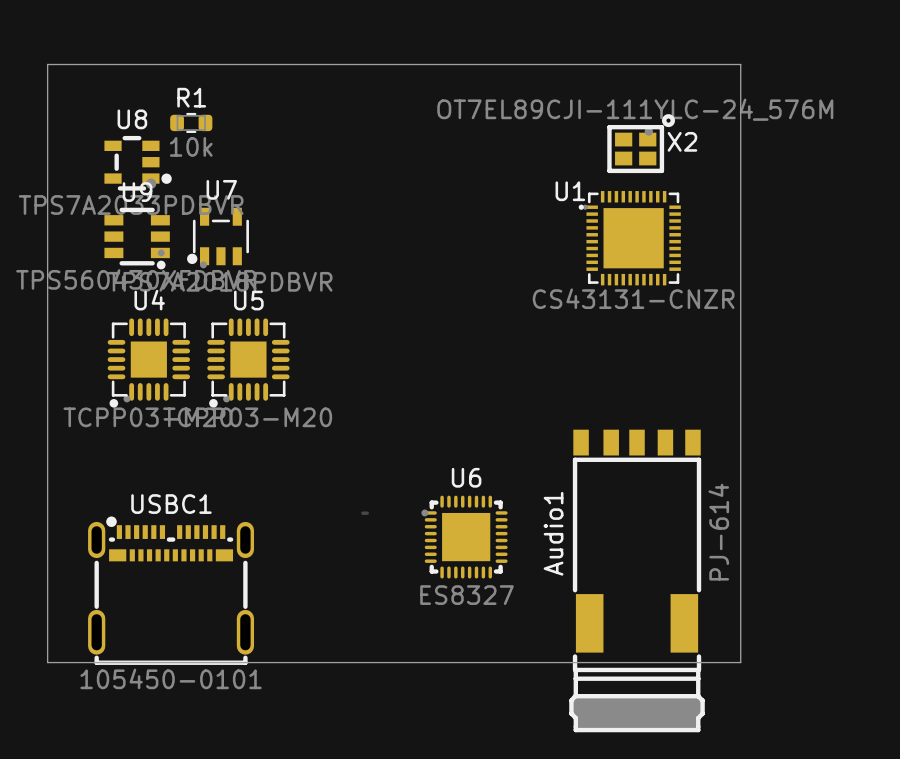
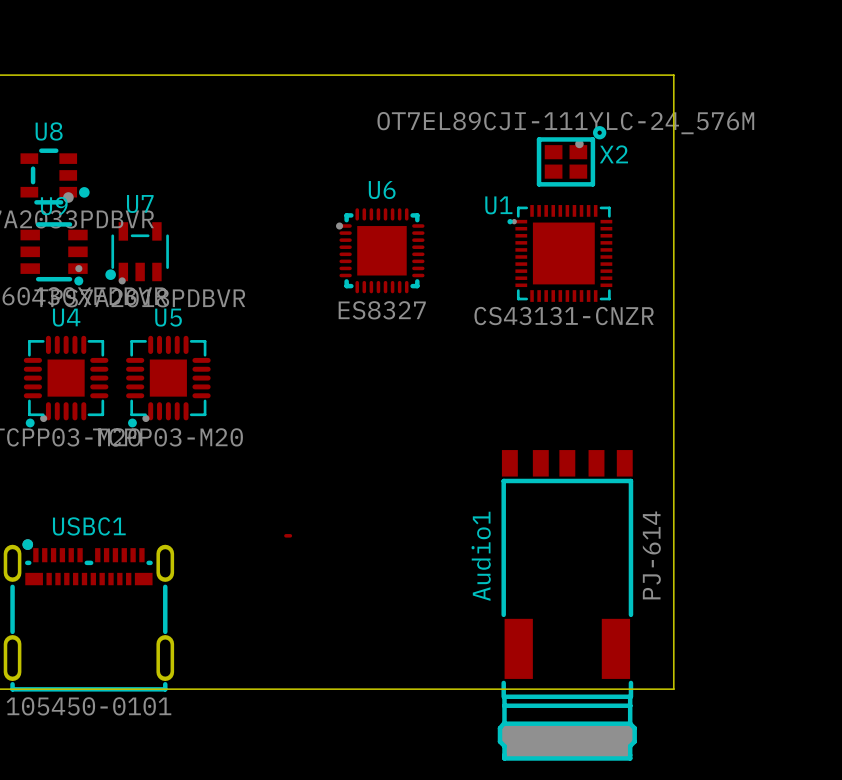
R1: 10k (191, 122) -> none
U6 position: (464, 537) -> (380, 250)

